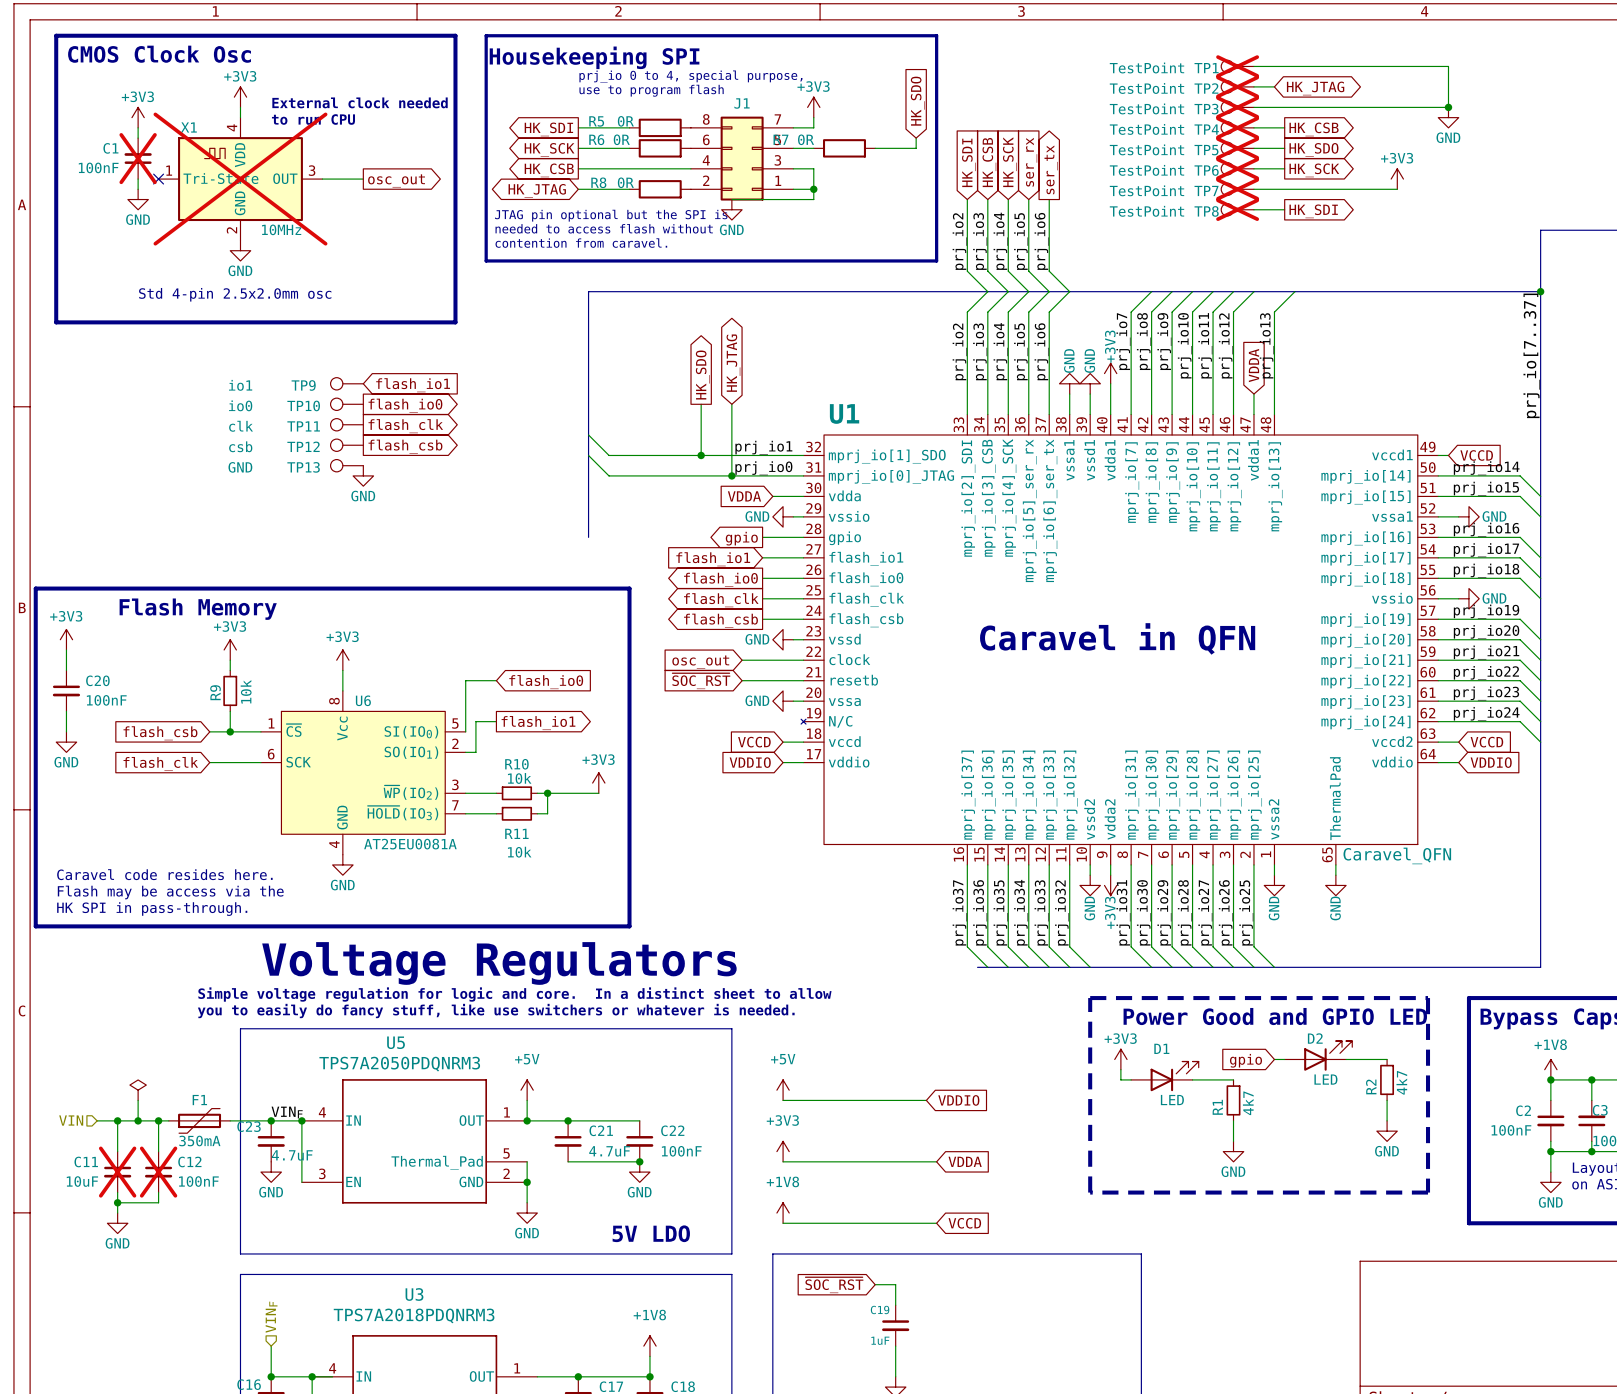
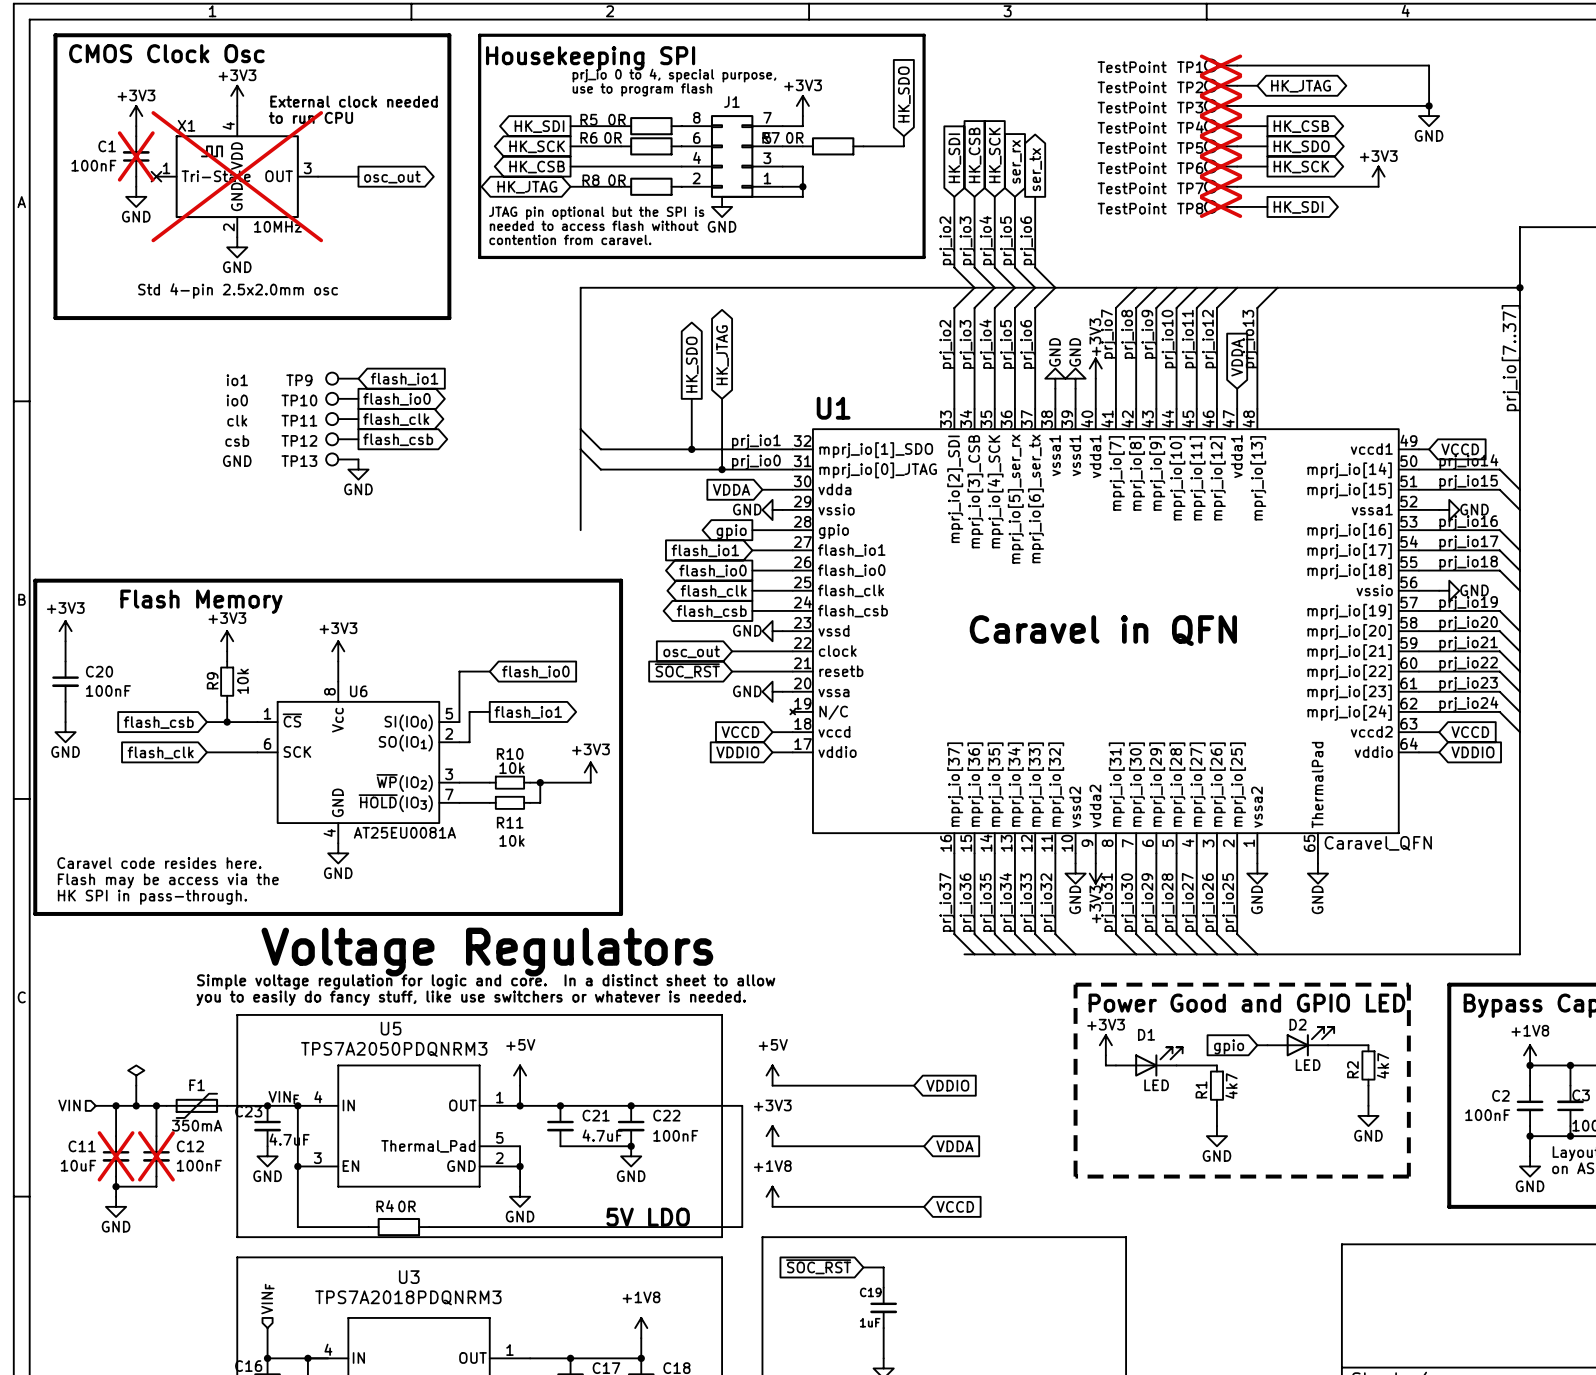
wire: none -> (631, 1105) (742, 1105) (742, 1227) (429, 1227)
junction: none -> (631, 1105)
wire: none -> (297, 1166) (297, 1227) (368, 1227)
junction: none -> (297, 1166)
R4: none -> 0R (398, 1227)

